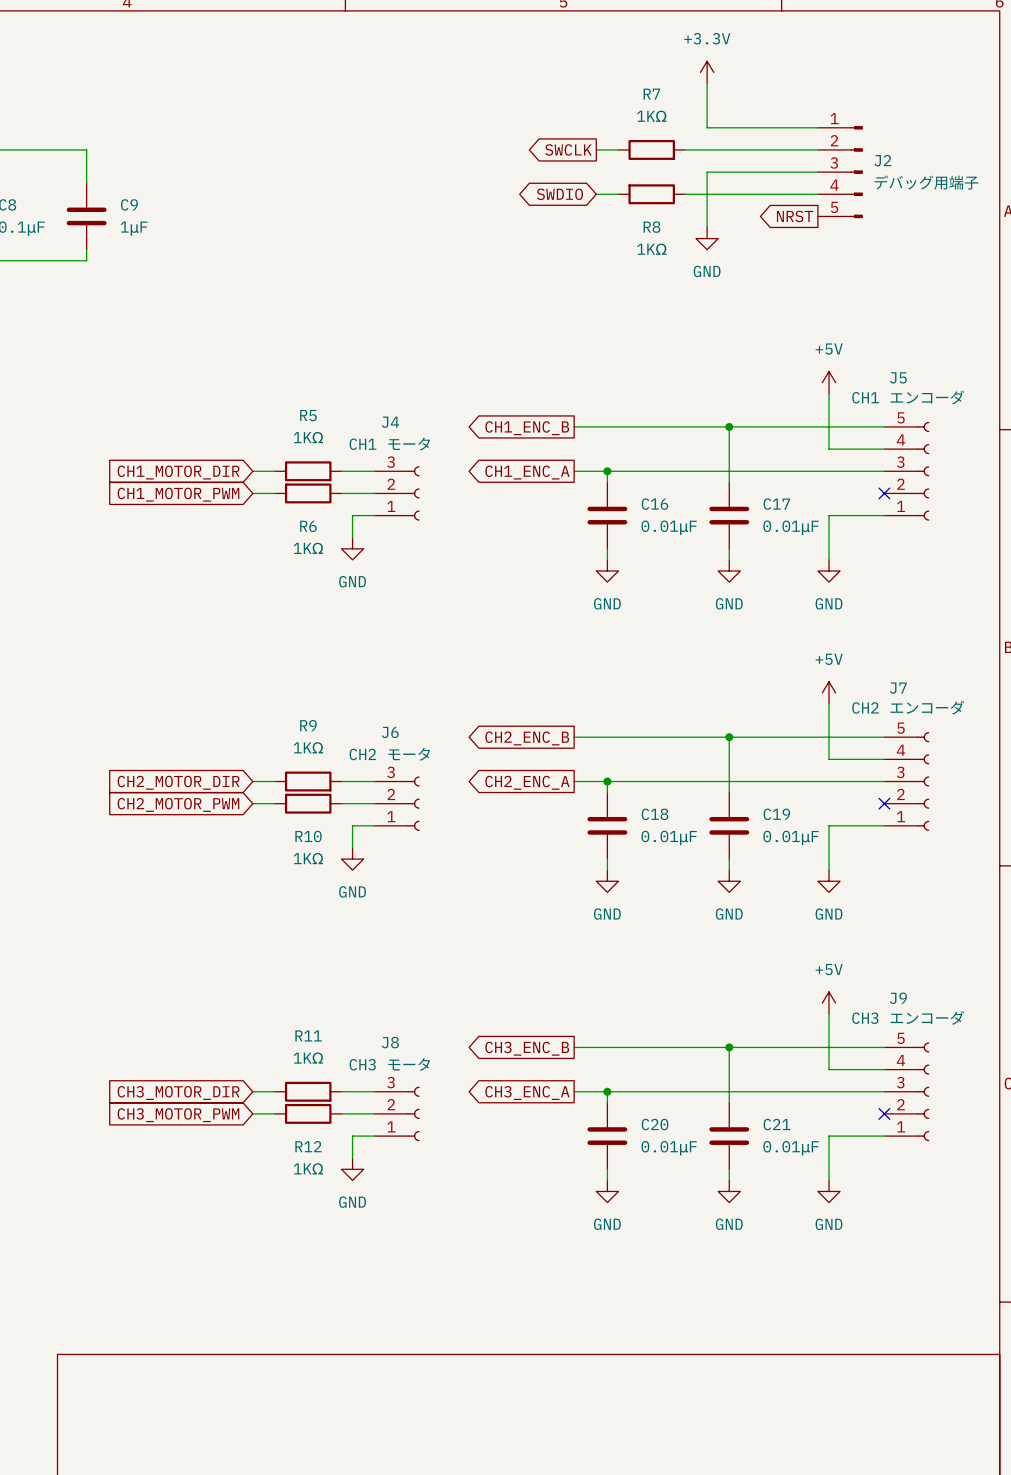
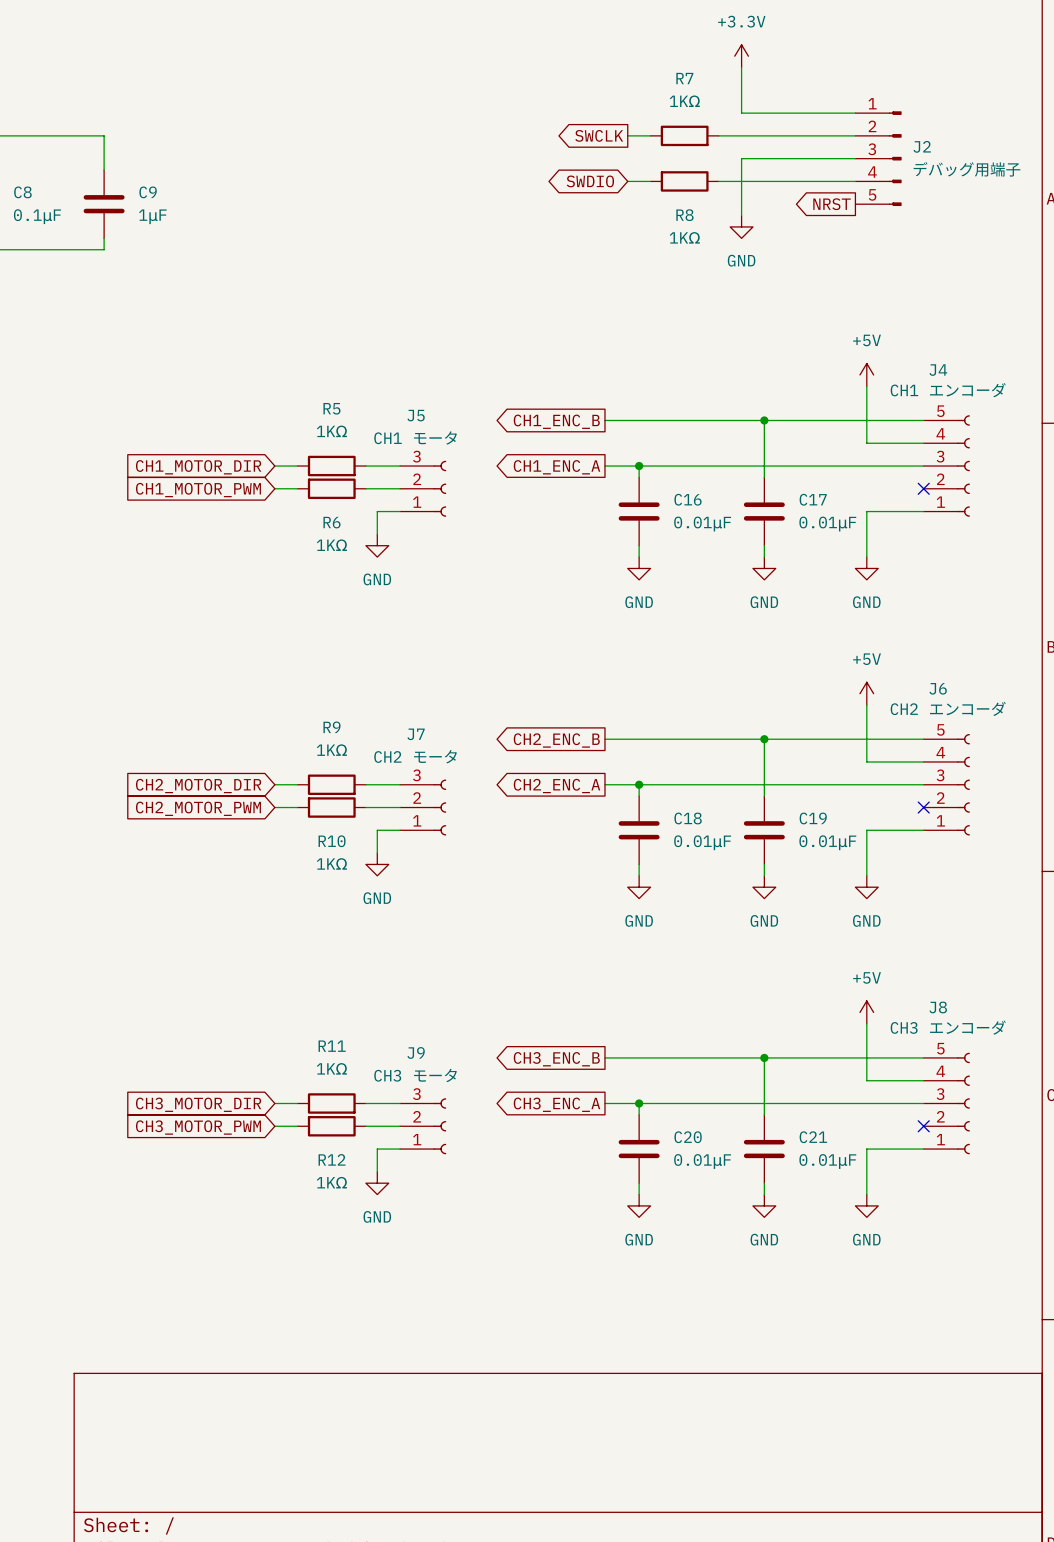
J5 name: J5 (898, 377) -> J4 (938, 370)
J4 name: J4 (390, 422) -> J5 (416, 415)
J7 name: J7 (898, 688) -> J6 (938, 688)
J6 name: J6 (390, 732) -> J7 (416, 734)
J9 name: J9 (898, 998) -> J8 (938, 1007)
J8 name: J8 (390, 1042) -> J9 (416, 1052)

